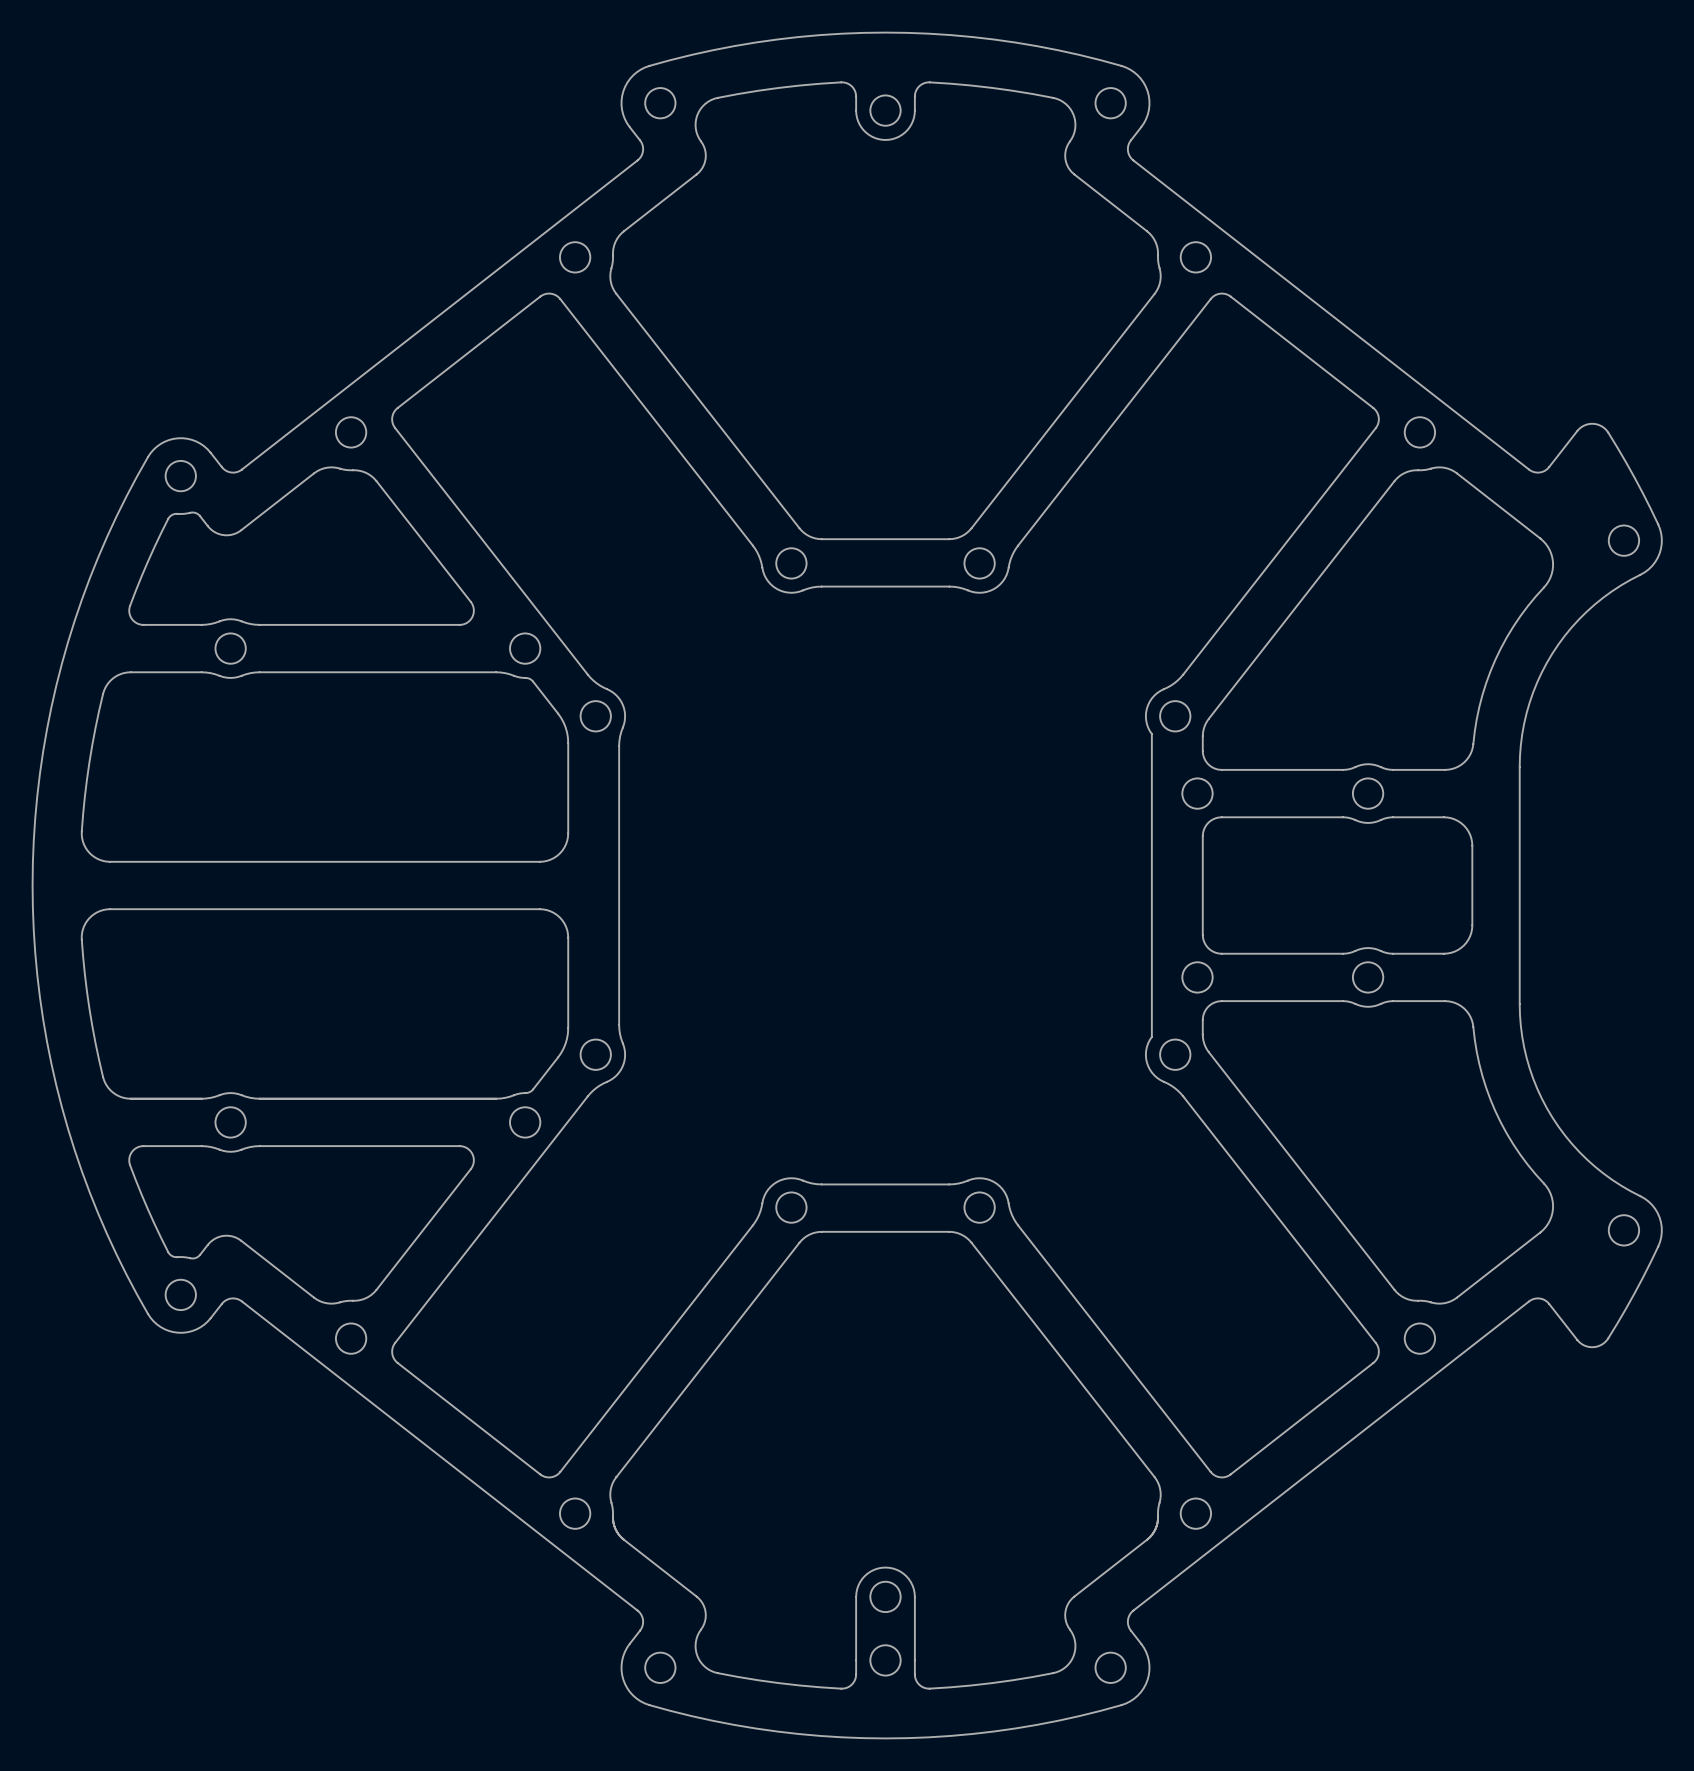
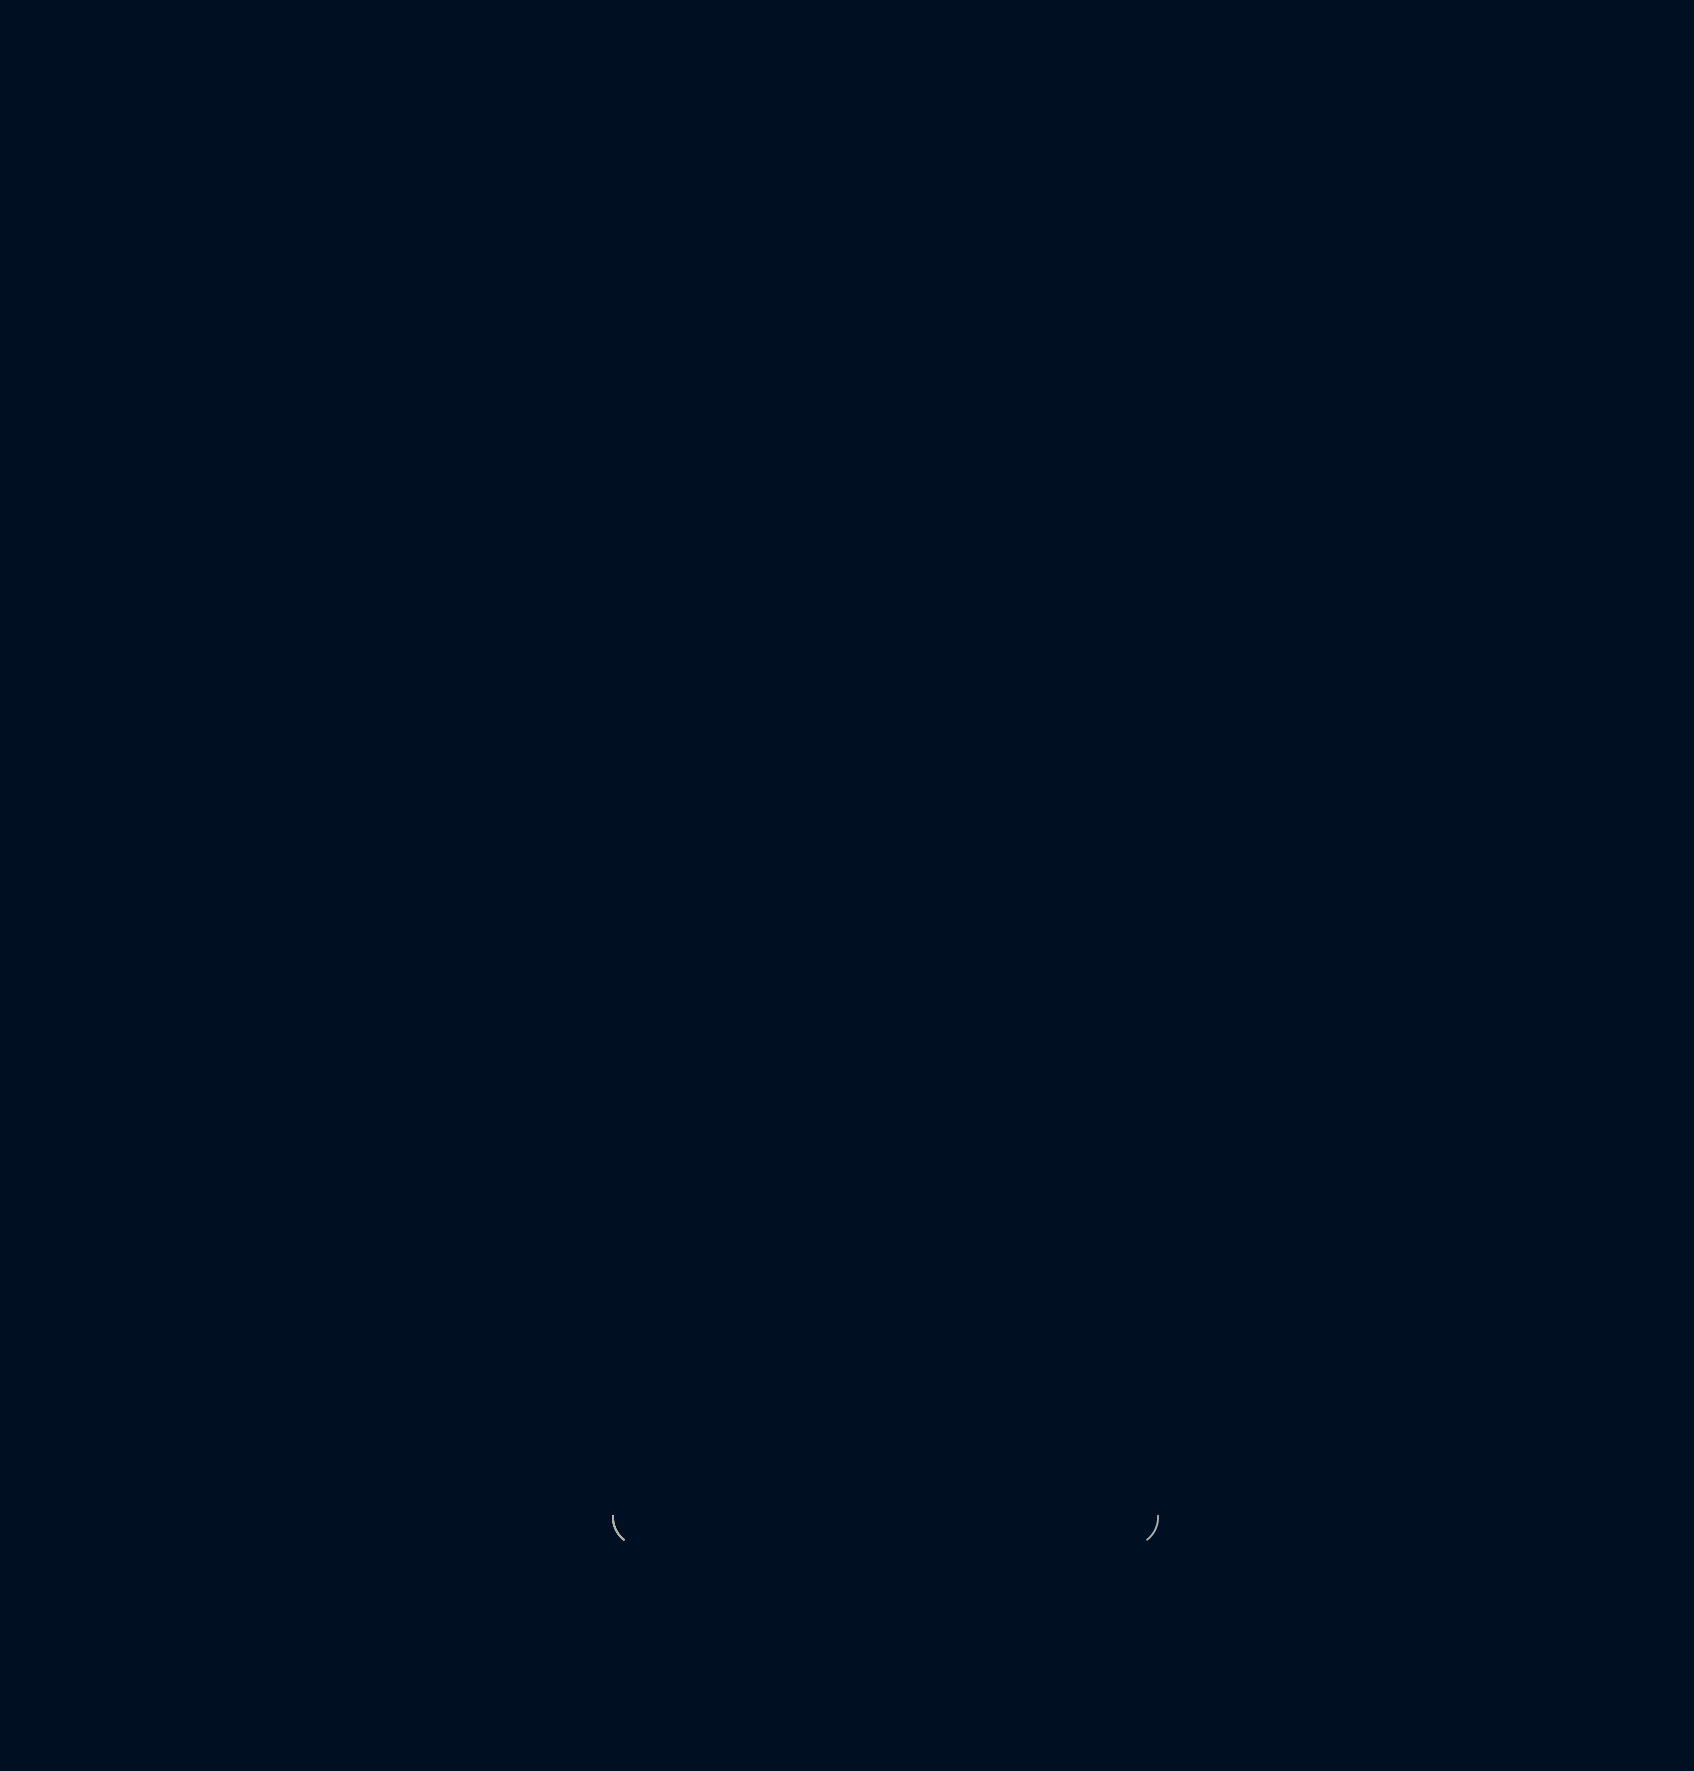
line: (649, 65) (712, 50) (755, 42) (820, 35) (885, 32) (950, 35) (1015, 42) (1079, 54) (1125, 67) (1137, 75) (1143, 82) (1149, 100) (1146, 119) (1128, 145) (1128, 154) (1133, 160) (1530, 470) (1539, 472) (1546, 469) (1582, 426) (1593, 423) (1603, 427) (1634, 477) (1660, 529) (1661, 548) (1652, 565) (1612, 591) (1586, 611) (1564, 635) (1546, 662) (1537, 682) (1526, 713) (1520, 745) (1519, 767) (1519, 1014) (1524, 1047) (1529, 1068) (1546, 1108) (1571, 1143) (1603, 1173) (1644, 1198) (1655, 1208) (1661, 1227) (1658, 1246) (1626, 1308) (1603, 1343) (1593, 1347) (1582, 1344) (1546, 1301) (1538, 1298) (1530, 1300) (1133, 1610) (1128, 1616) (1128, 1624) (1146, 1652) (1149, 1670) (1147, 1679) (1140, 1692) (1130, 1701) (1121, 1705) (1079, 1716) (1015, 1728) (950, 1735) (885, 1738) (820, 1735) (755, 1728) (691, 1716) (640, 1701) (627, 1688) (621, 1670) (624, 1652) (642, 1626) (642, 1618) (638, 1611) (241, 1301) (233, 1298) (226, 1300) (204, 1324) (187, 1332) (169, 1330) (153, 1321) (136, 1294) (107, 1234) (82, 1171) (68, 1128) (47, 1041) (35, 952) (32, 885) (37, 795) (51, 707) (74, 620) (107, 536) (136, 476) (153, 449) (164, 441) (178, 438) (187, 438) (200, 443) (226, 471) (234, 472) (240, 470) (637, 160) (642, 154) (642, 146) (624, 119) (621, 100) (623, 91) (630, 78) (640, 69) (649, 65) -> none
line: (841, 82) (849, 84) (854, 90) (856, 114) (861, 127) (868, 134) (881, 139) (895, 138) (909, 127) (914, 114) (915, 91) (920, 85) (926, 82) (991, 87) (1059, 100) (1070, 108) (1075, 121) (1074, 132) (1065, 152) (1068, 167) (1074, 174) (1149, 233) (1157, 248) (1160, 278) (1154, 293) (971, 528) (964, 534) (955, 538) (821, 539) (812, 537) (803, 532) (616, 293) (610, 281) (613, 248) (619, 236) (696, 174) (702, 167) (705, 152) (697, 135) (695, 125) (697, 115) (705, 103) (717, 97) (758, 90) (841, 82) -> none
drawing: [644, 87, 677, 120] -> none
drawing: [1094, 87, 1127, 120] -> none
drawing: [869, 94, 902, 127] -> none
drawing: [559, 241, 592, 274] -> none
drawing: [1179, 241, 1212, 274] -> none
line: (540, 296) (397, 408) (393, 413) (392, 421) (395, 428) (587, 674) (596, 683) (615, 694) (622, 705) (625, 718) (619, 746) (619, 1025) (624, 1049) (624, 1059) (621, 1068) (615, 1076) (596, 1087) (587, 1096) (395, 1343) (392, 1349) (393, 1358) (540, 1474) (545, 1477) (553, 1476) (560, 1471) (752, 1225) (758, 1215) (764, 1195) (773, 1184) (791, 1178) (821, 1184) (949, 1184) (983, 1178) (993, 1181) (1002, 1189) (1011, 1215) (1018, 1225) (1210, 1471) (1220, 1477) (1229, 1475) (1373, 1362) (1377, 1357) (1378, 1349) (1375, 1342) (1183, 1096) (1174, 1087) (1157, 1078) (1148, 1066) (1146, 1051) (1151, 1036) (1151, 734) (1146, 723) (1146, 712) (1154, 695) (1174, 683) (1183, 674) (1375, 428) (1378, 419) (1377, 412) (1230, 296) (1223, 293) (1217, 294) (1210, 299) (1018, 545) (1011, 555) (1006, 575) (997, 586) (979, 592) (949, 586) (821, 586) (787, 592) (777, 589) (768, 581) (759, 555) (752, 545) (560, 299) (550, 293) (540, 296) -> none
drawing: [334, 416, 368, 449] -> none
drawing: [1403, 416, 1437, 449] -> none
drawing: [164, 459, 197, 493] -> none
line: (339, 468) (362, 471) (376, 481) (471, 603) (473, 613) (469, 621) (459, 624) (259, 624) (230, 619) (206, 624) (143, 624) (136, 623) (131, 618) (129, 612) (130, 605) (154, 547) (171, 515) (195, 513) (216, 532) (223, 535) (234, 534) (316, 471) (326, 467) (339, 468) -> none
line: (1431, 468) (1444, 467) (1456, 473) (1543, 541) (1550, 550) (1553, 562) (1548, 581) (1520, 616) (1495, 659) (1482, 694) (1472, 747) (1468, 757) (1458, 766) (1445, 769) (1389, 769) (1368, 764) (1343, 769) (1221, 769) (1209, 765) (1204, 759) (1202, 750) (1203, 730) (1208, 718) (1396, 478) (1408, 471) (1431, 468) -> none
drawing: [1607, 524, 1641, 557] -> none
drawing: [775, 547, 808, 580] -> none
drawing: [963, 547, 996, 580] -> none
drawing: [214, 632, 247, 665] -> none
drawing: [509, 632, 542, 665] -> none
line: (130, 672) (206, 672) (230, 677) (259, 672) (496, 672) (528, 678) (558, 713) (567, 732) (568, 833) (566, 844) (557, 855) (539, 861) (110, 861) (100, 860) (89, 852) (82, 838) (89, 762) (105, 688) (115, 676) (130, 672) -> none
drawing: [579, 700, 612, 733] -> none
drawing: [1159, 700, 1192, 733] -> none
drawing: [1181, 777, 1214, 810] -> none
drawing: [1351, 777, 1385, 810] -> none
line: (1221, 817) (1343, 817) (1368, 822) (1393, 817) (1443, 817) (1454, 819) (1466, 828) (1472, 841) (1472, 925) (1470, 936) (1461, 947) (1443, 953) (1389, 953) (1368, 948) (1343, 953) (1214, 952) (1206, 946) (1202, 937) (1202, 836) (1208, 822) (1221, 817) -> none
line: (110, 909) (547, 910) (559, 917) (567, 933) (568, 1028) (565, 1043) (558, 1057) (531, 1090) (500, 1098) (259, 1098) (230, 1093) (201, 1098) (121, 1097) (110, 1090) (103, 1077) (89, 1008) (81, 939) (82, 929) (89, 918) (100, 910) (110, 909) -> none
drawing: [1181, 961, 1214, 994] -> none
drawing: [1351, 961, 1385, 994] -> none
line: (1221, 1001) (1343, 1001) (1368, 1006) (1389, 1001) (1445, 1001) (1461, 1006) (1471, 1020) (1479, 1064) (1495, 1111) (1513, 1144) (1550, 1193) (1553, 1208) (1548, 1223) (1540, 1232) (1451, 1301) (1437, 1303) (1411, 1300) (1402, 1296) (1394, 1289) (1207, 1049) (1202, 1037) (1203, 1015) (1210, 1005) (1221, 1001) -> none
drawing: [579, 1038, 612, 1071] -> none
drawing: [1159, 1038, 1192, 1071] -> none
drawing: [214, 1106, 247, 1139] -> none
drawing: [509, 1106, 542, 1139] -> none
line: (143, 1146) (206, 1146) (230, 1151) (259, 1146) (459, 1146) (469, 1149) (473, 1160) (470, 1169) (374, 1292) (359, 1300) (329, 1303) (314, 1297) (241, 1240) (232, 1236) (223, 1235) (214, 1238) (195, 1258) (175, 1257) (170, 1254) (147, 1209) (129, 1163) (129, 1156) (132, 1150) (143, 1146) -> none
drawing: [775, 1191, 808, 1224] -> none
drawing: [963, 1191, 996, 1224] -> none
drawing: [1607, 1214, 1641, 1247] -> none
drawing: [164, 1278, 197, 1312] -> none
drawing: [334, 1322, 368, 1355] -> none
drawing: [1403, 1322, 1437, 1355] -> none
drawing: [559, 1497, 592, 1530] -> none
drawing: [1179, 1497, 1212, 1530] -> none
line: (612, 1515) (610, 1492) (616, 1477) (799, 1242) (809, 1234) (821, 1231) (949, 1231) (958, 1233) (967, 1238) (1154, 1477) (1160, 1492) (1157, 1522) (1151, 1534) (1074, 1596) (1068, 1603) (1065, 1618) (1073, 1635) (1075, 1645) (1072, 1659) (1065, 1667) (1056, 1672) (1032, 1676) (950, 1687) (926, 1688) (920, 1685) (916, 1680) (914, 1593) (908, 1579) (896, 1569) (885, 1567) (874, 1569) (864, 1576) (858, 1585) (856, 1596) (856, 1674) (852, 1683) (842, 1688) (799, 1685) (717, 1673) (705, 1667) (697, 1655) (695, 1645) (697, 1635) (705, 1618) (702, 1603) (696, 1596) (623, 1539) -> none
drawing: [869, 1580, 902, 1614] -> none
drawing: [869, 1644, 902, 1677] -> none
drawing: [644, 1651, 677, 1684] -> none
drawing: [1094, 1651, 1127, 1684] -> none

